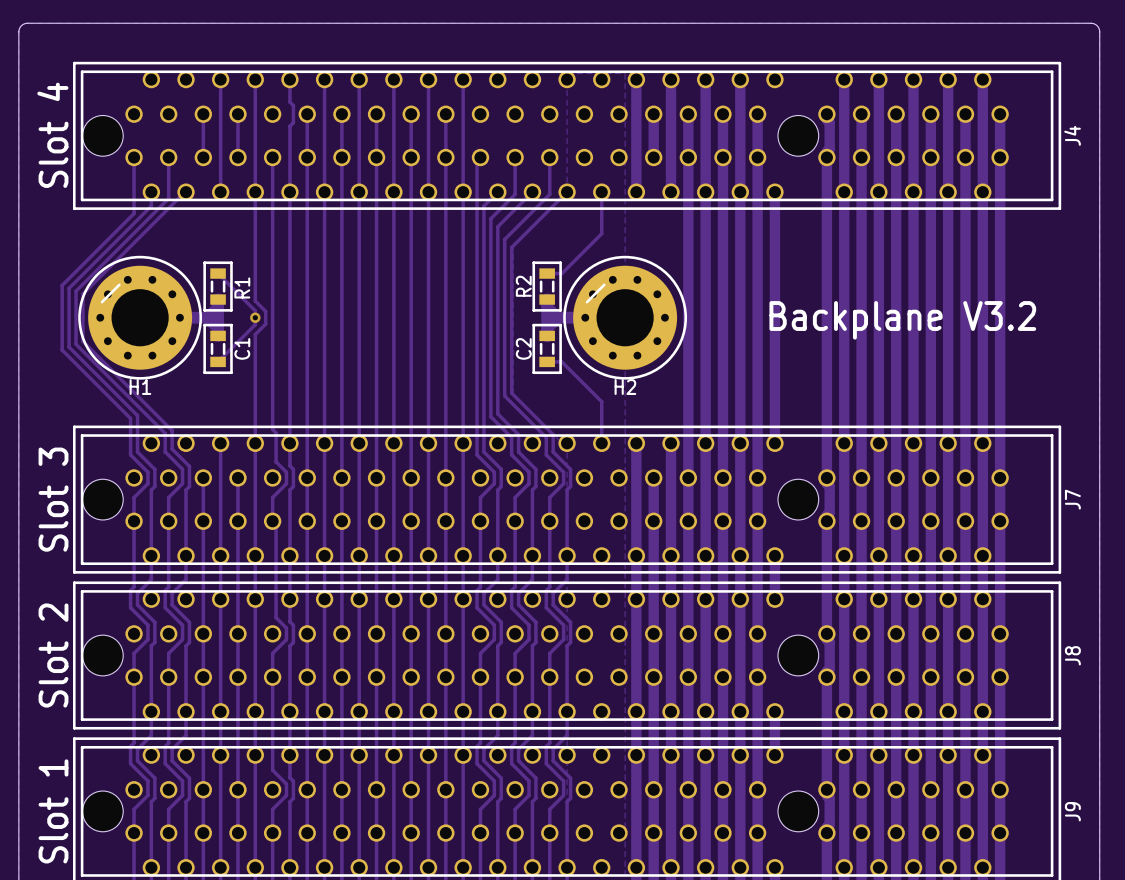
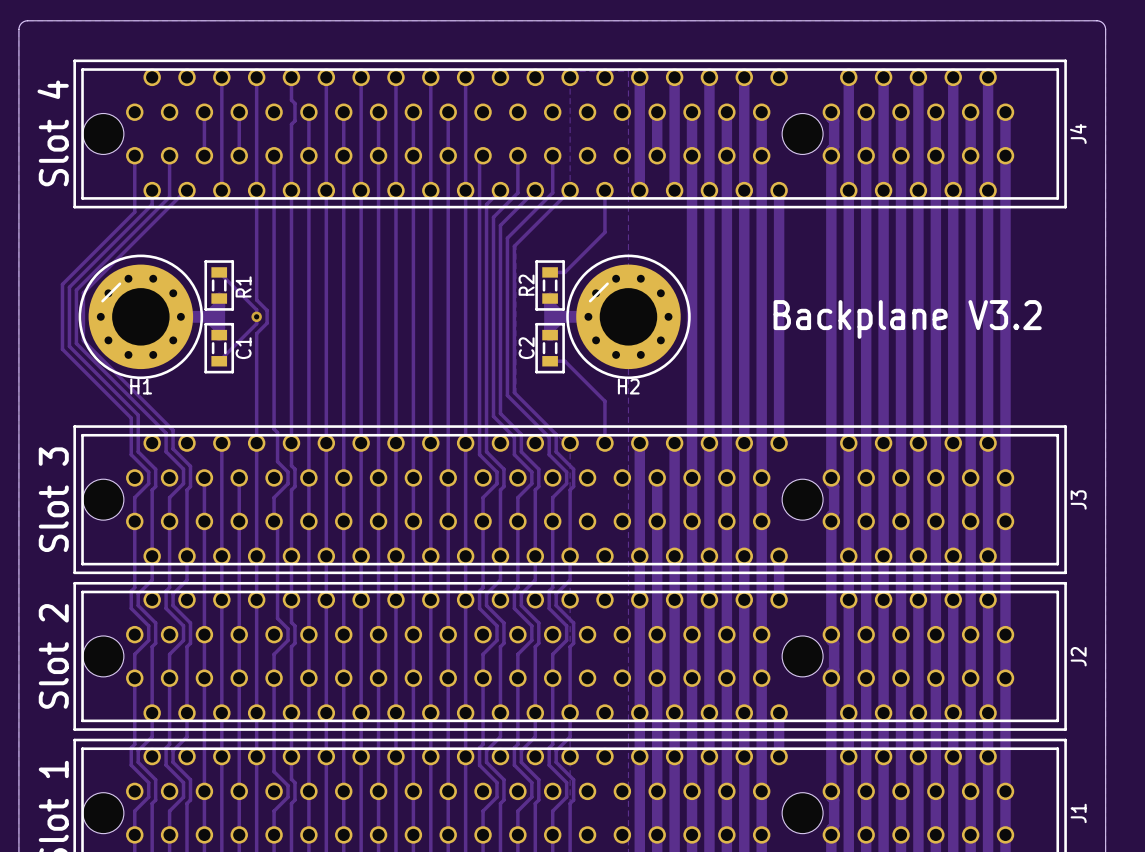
J7 name: J7 (1072, 499) -> J3 (1078, 499)
J8 name: J8 (1072, 655) -> J2 (1078, 656)
J9 name: J9 (1072, 811) -> J1 (1078, 813)

